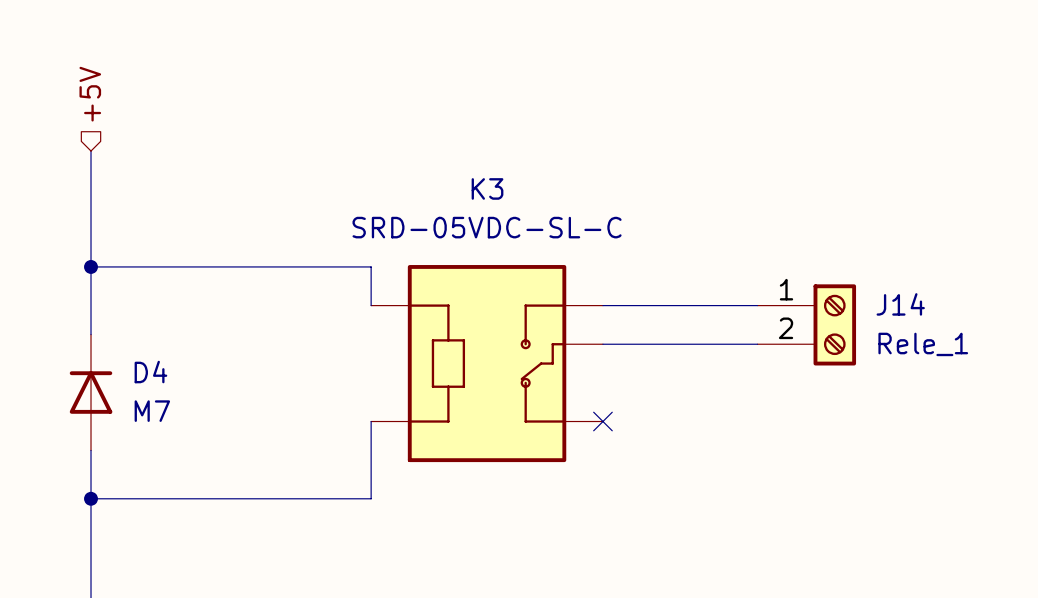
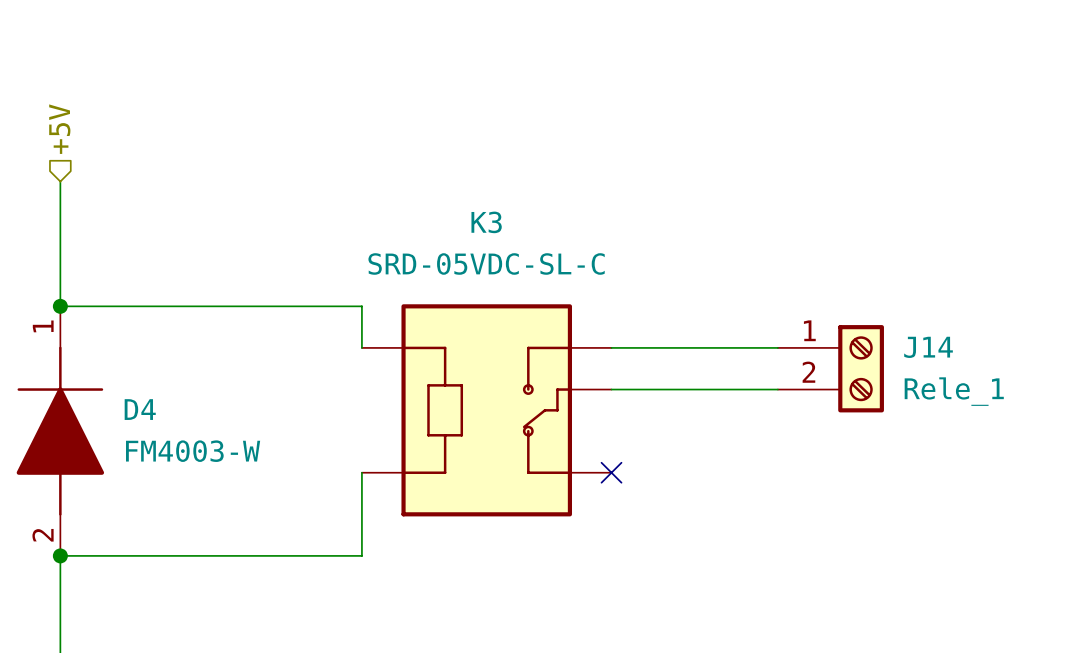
D4 symbol: [69, 334, 113, 451] -> [16, 306, 105, 556]
D4 value: M7 (152, 411) -> FM4003-W (193, 451)

